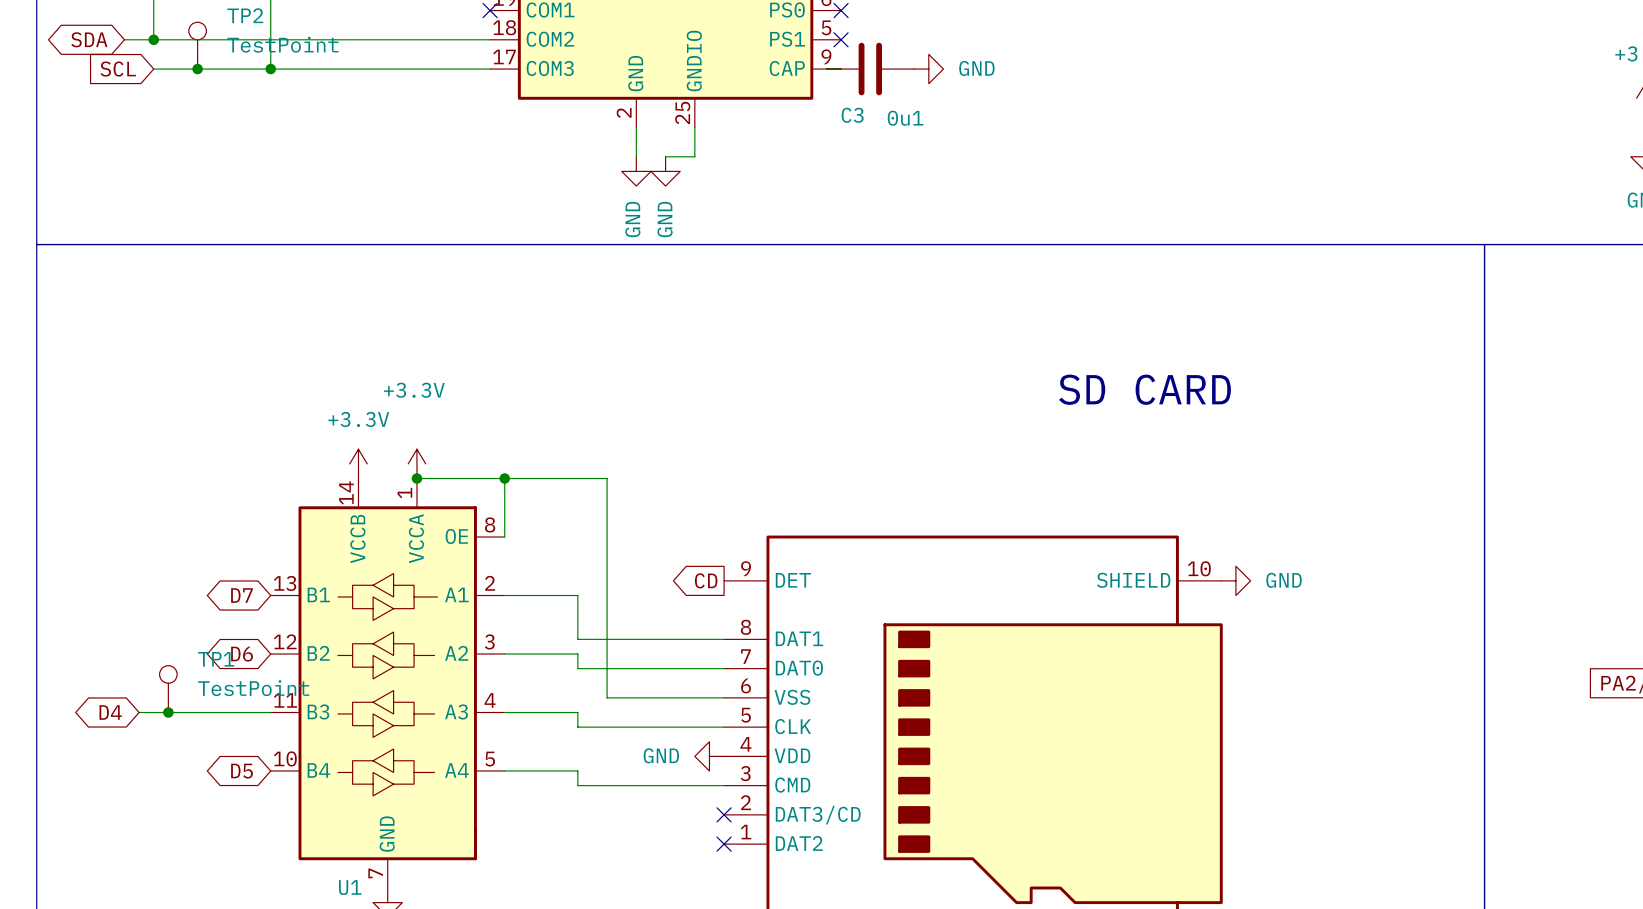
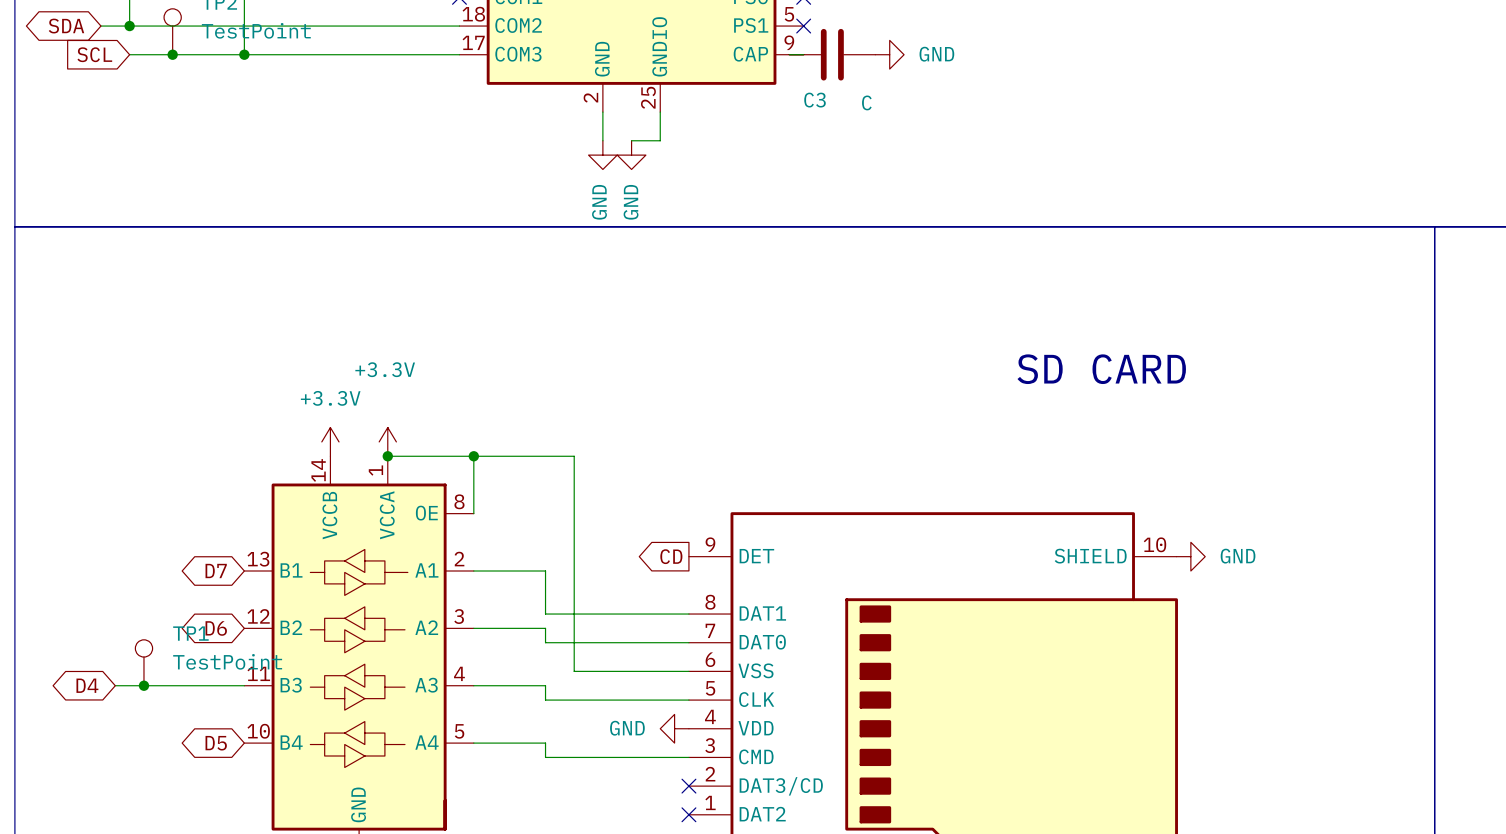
C3 value: 0u1 (905, 118) -> C (866, 102)

